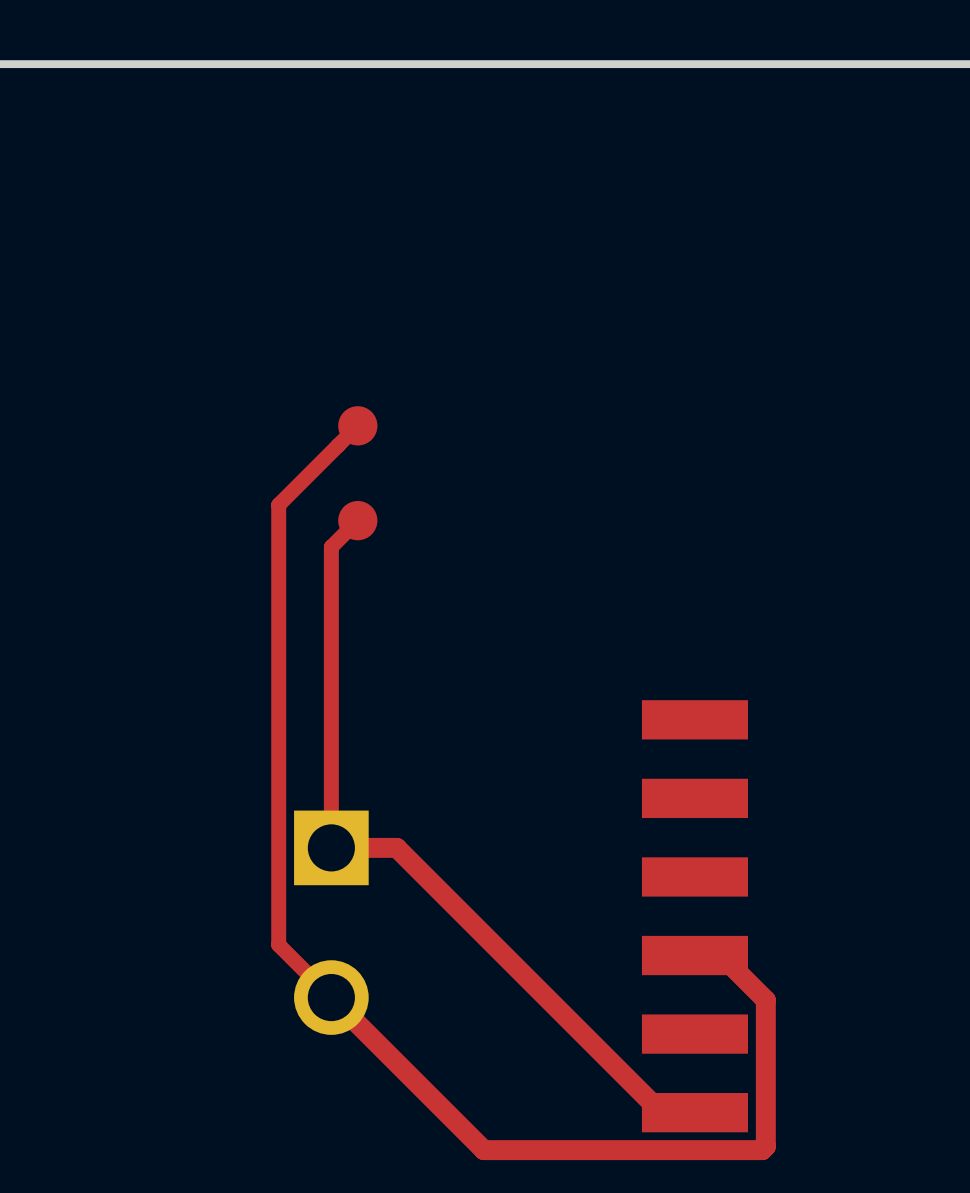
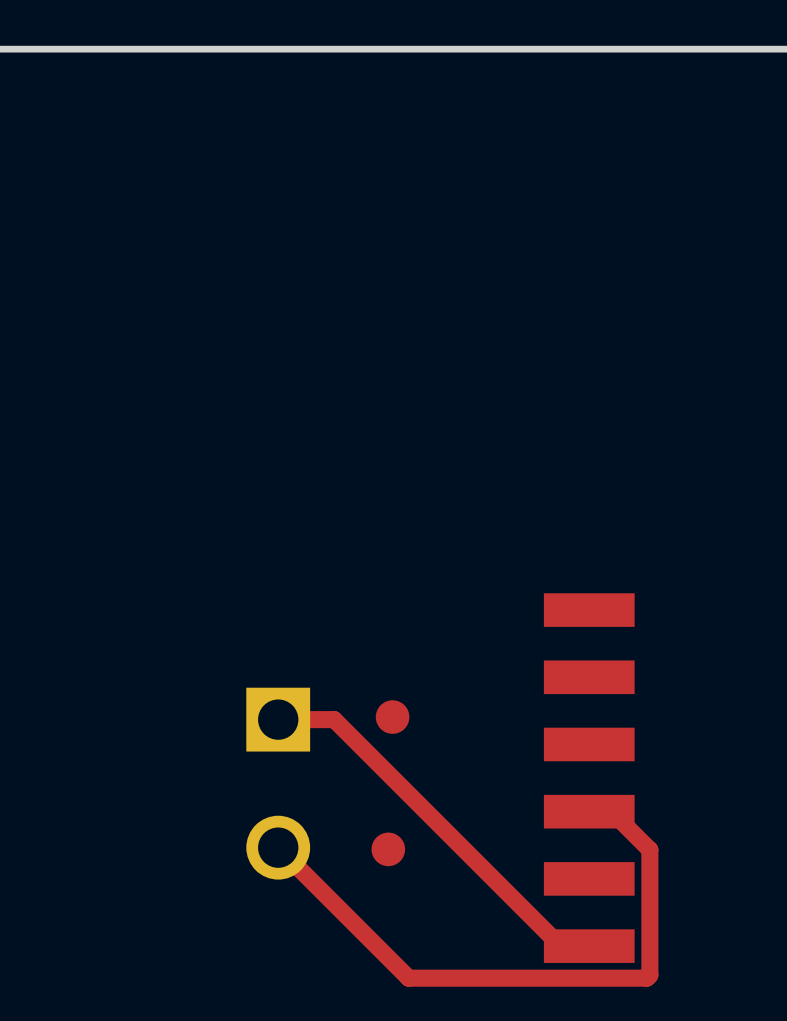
top track: (357, 425) (278, 504) (278, 944) (331, 997) -> none
part: (357, 425) -> none
top track: (357, 520) (331, 547) (331, 847) -> none
part: (357, 520) -> none
part: none -> (392, 717)
part: none -> (388, 849)

